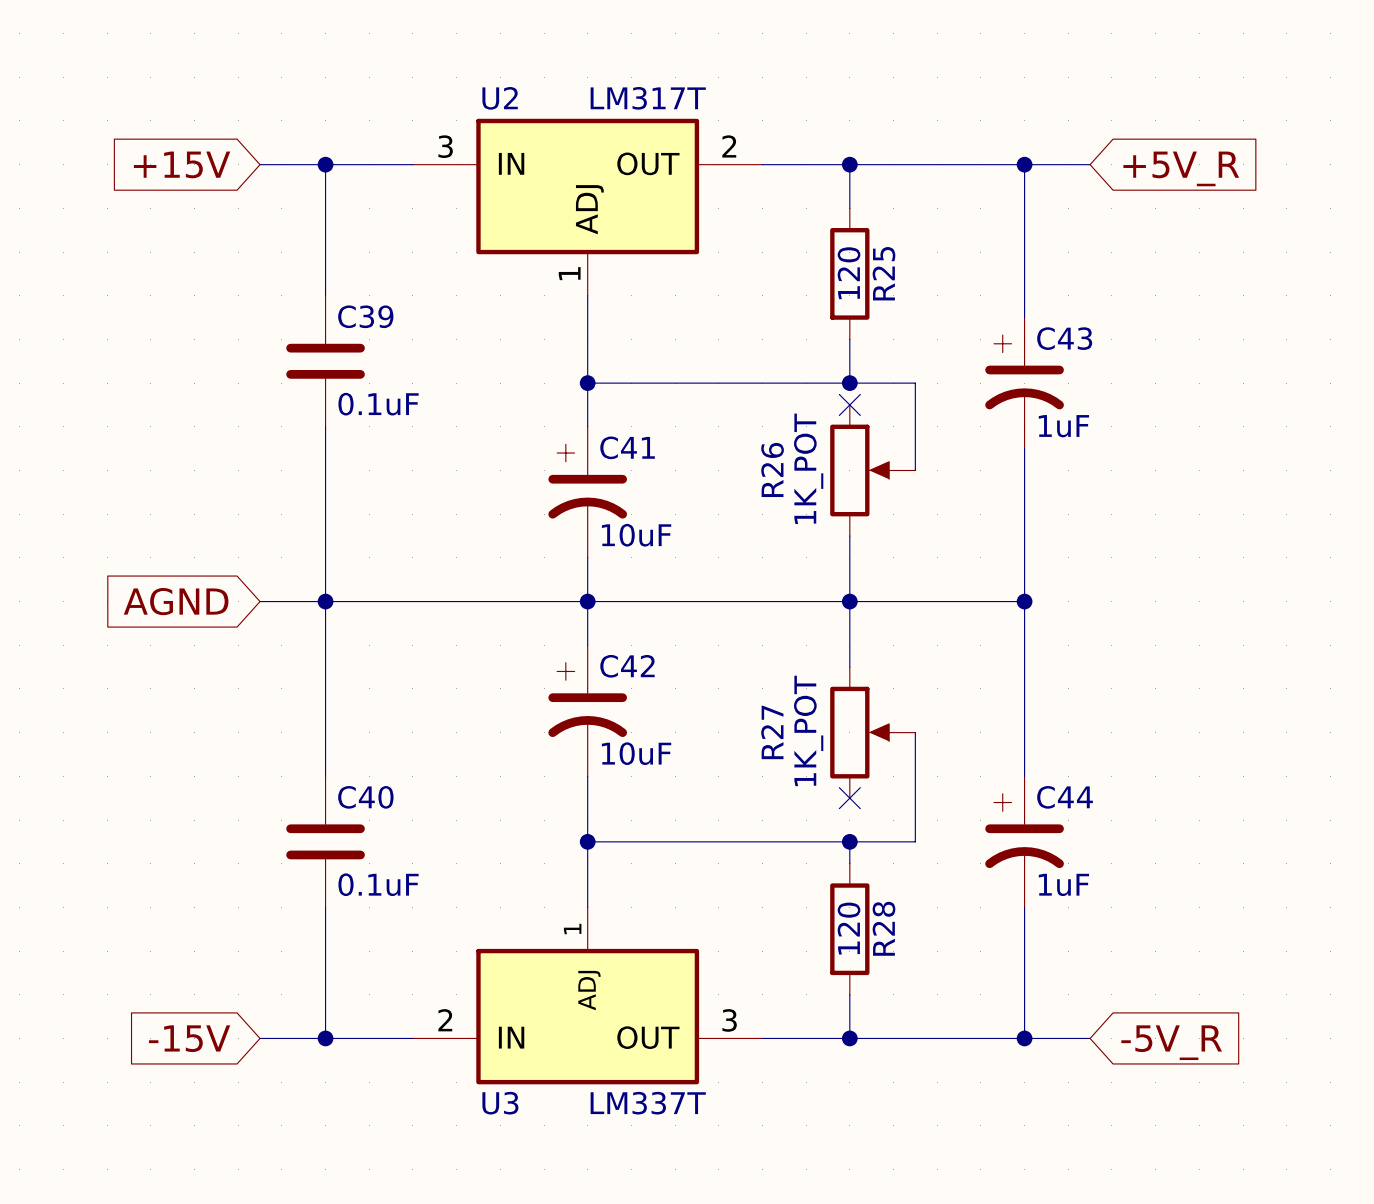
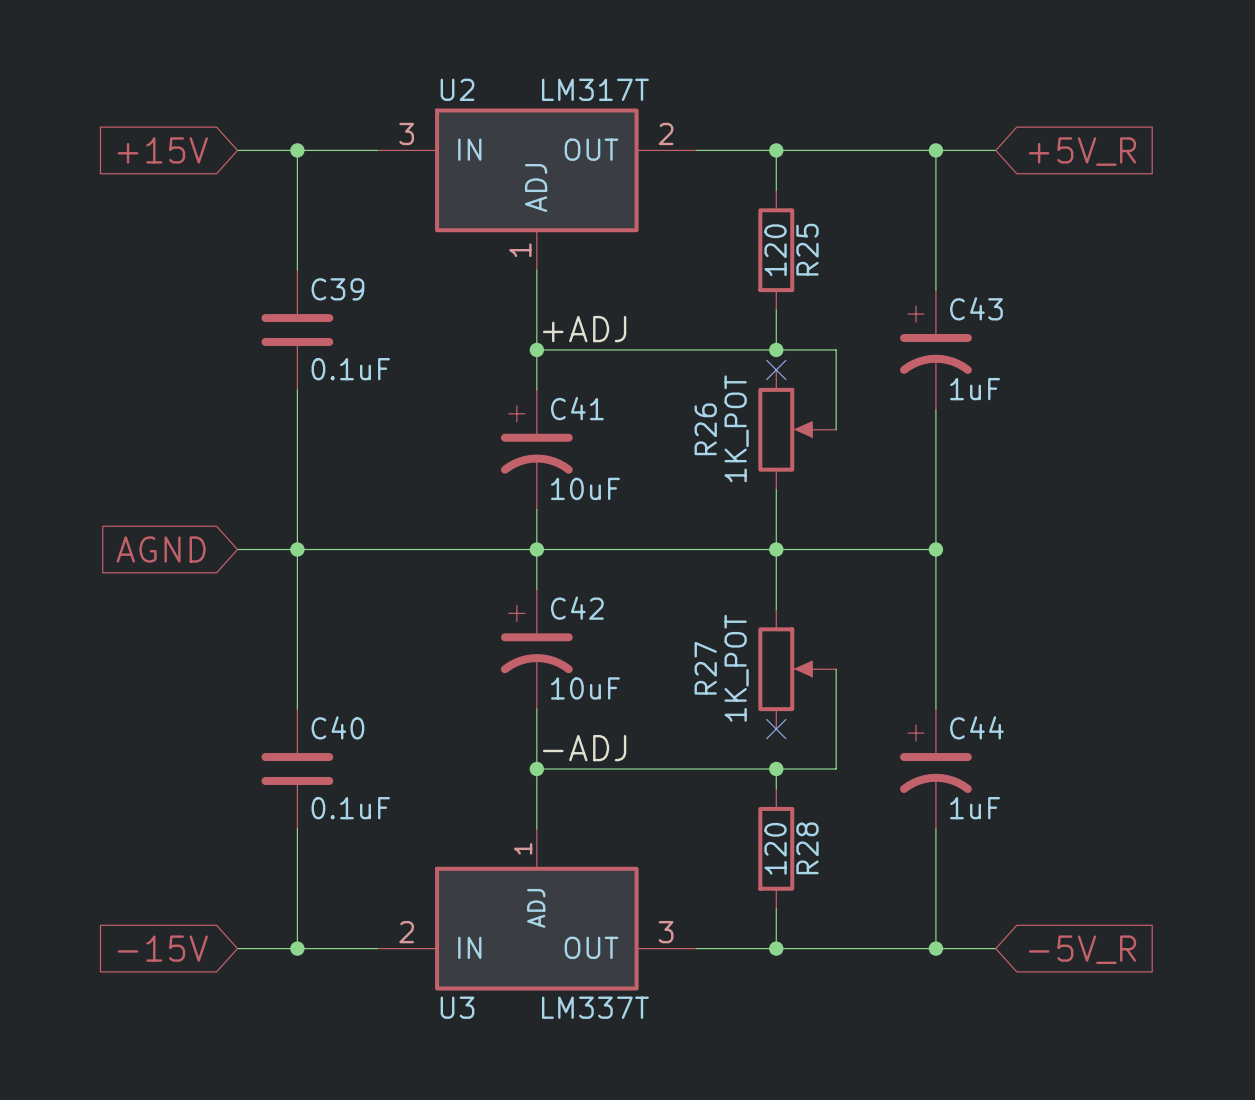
label: none -> +ADJ (584, 329)
label: none -> -ADJ (584, 748)

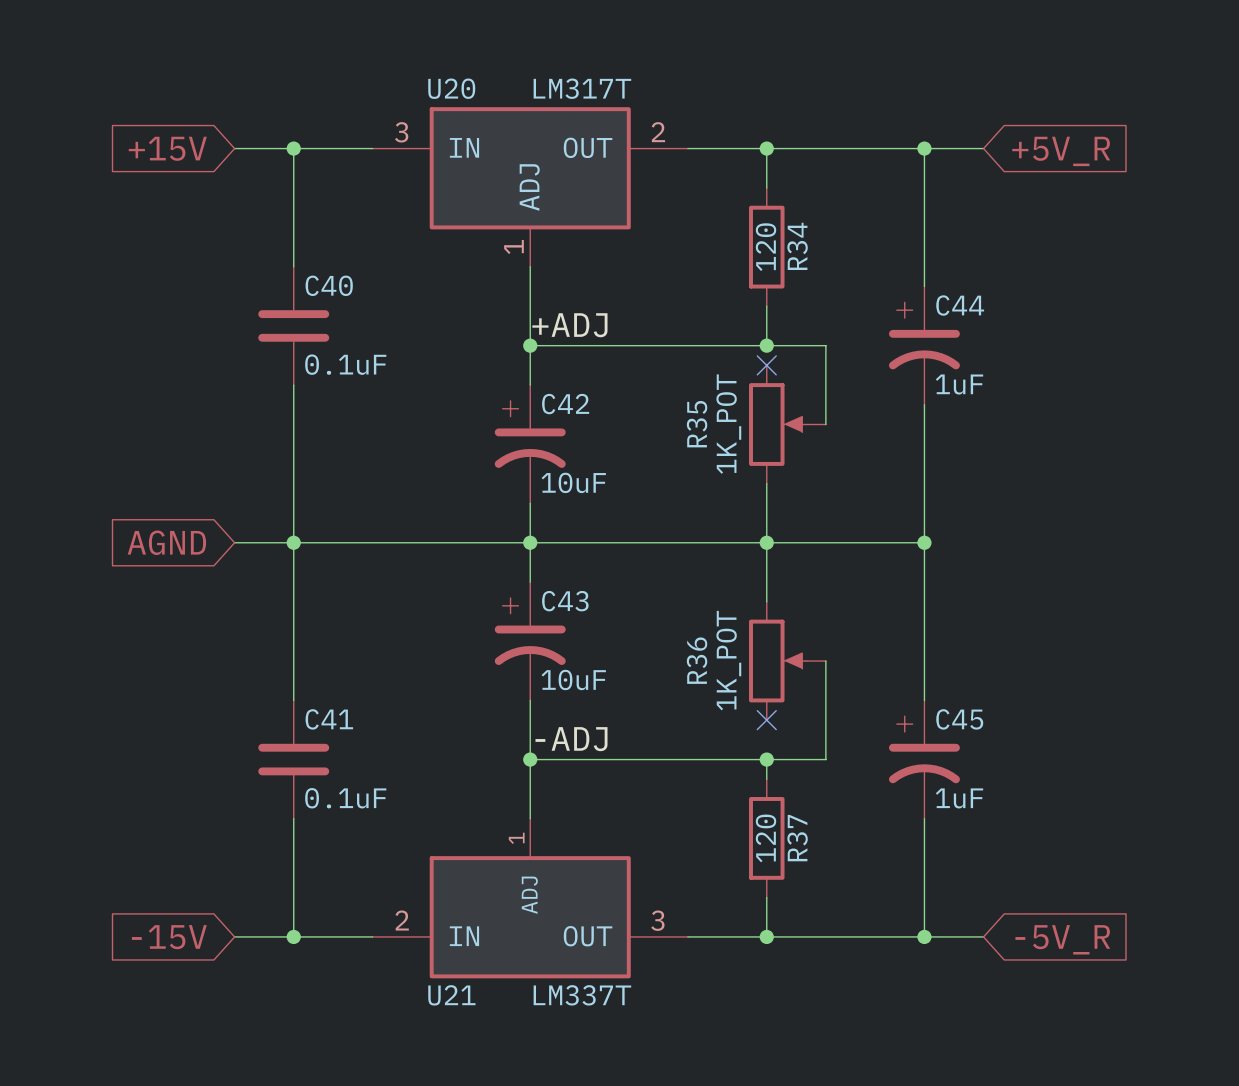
U2 name: U2 (457, 89) -> U20 (451, 88)
R25 name: R25 (807, 249) -> R34 (797, 246)
C39 name: C39 (337, 289) -> C40 (329, 285)
C43 name: C43 (976, 308) -> C44 (960, 305)
C41 name: C41 (577, 408) -> C42 (565, 404)
R26 name: R26 (705, 429) -> R35 (697, 424)
C42 name: C42 (577, 608) -> C43 (565, 601)
R27 name: R27 (705, 668) -> R36 (697, 660)
C40 name: C40 (337, 727) -> C41 (329, 719)
C44 name: C44 (976, 727) -> C45 (959, 719)
R28 name: R28 (807, 848) -> R37 (797, 838)
U3 name: U3 (457, 1007) -> U21 (451, 995)

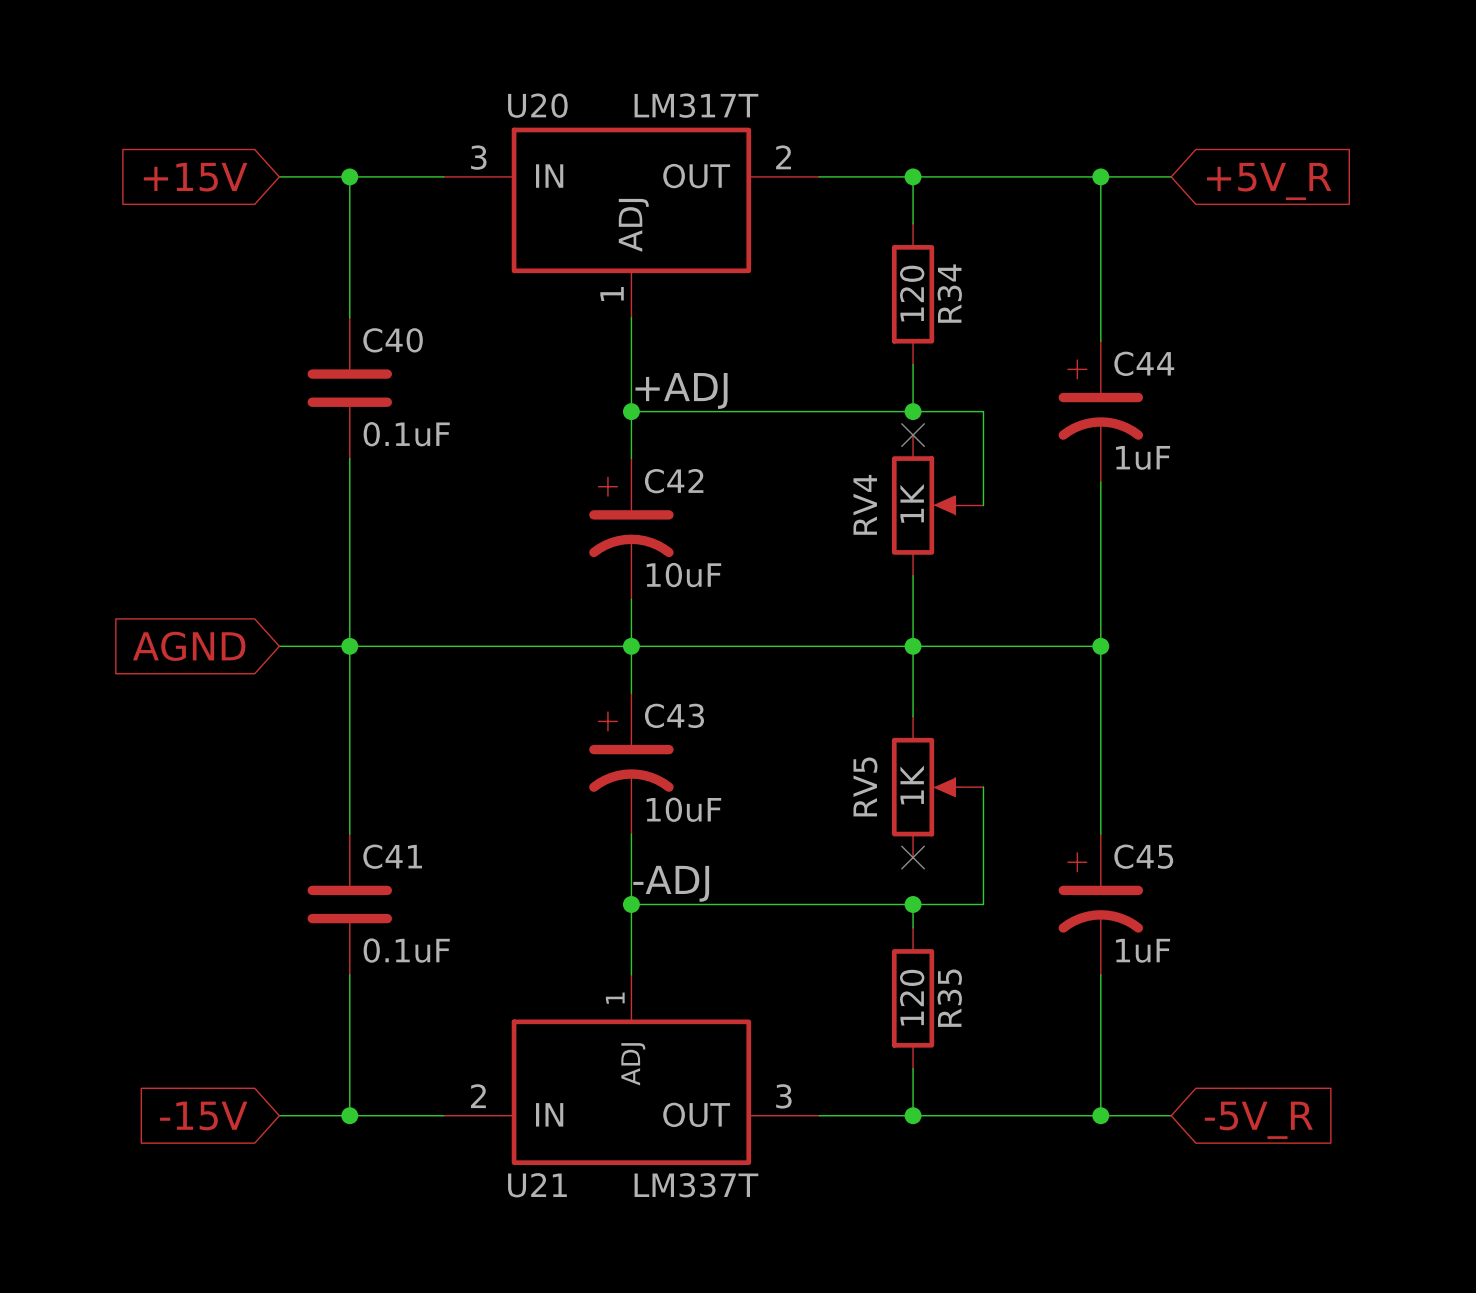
R35 name: R35 (697, 424) -> RV4 (865, 504)
R35 value: 1K_POT (728, 424) -> 1K (912, 503)
R36: 1K_POT (787, 661) -> none
RV5: none -> 1K (937, 787)
R37 name: R37 (797, 838) -> R35 (949, 998)

